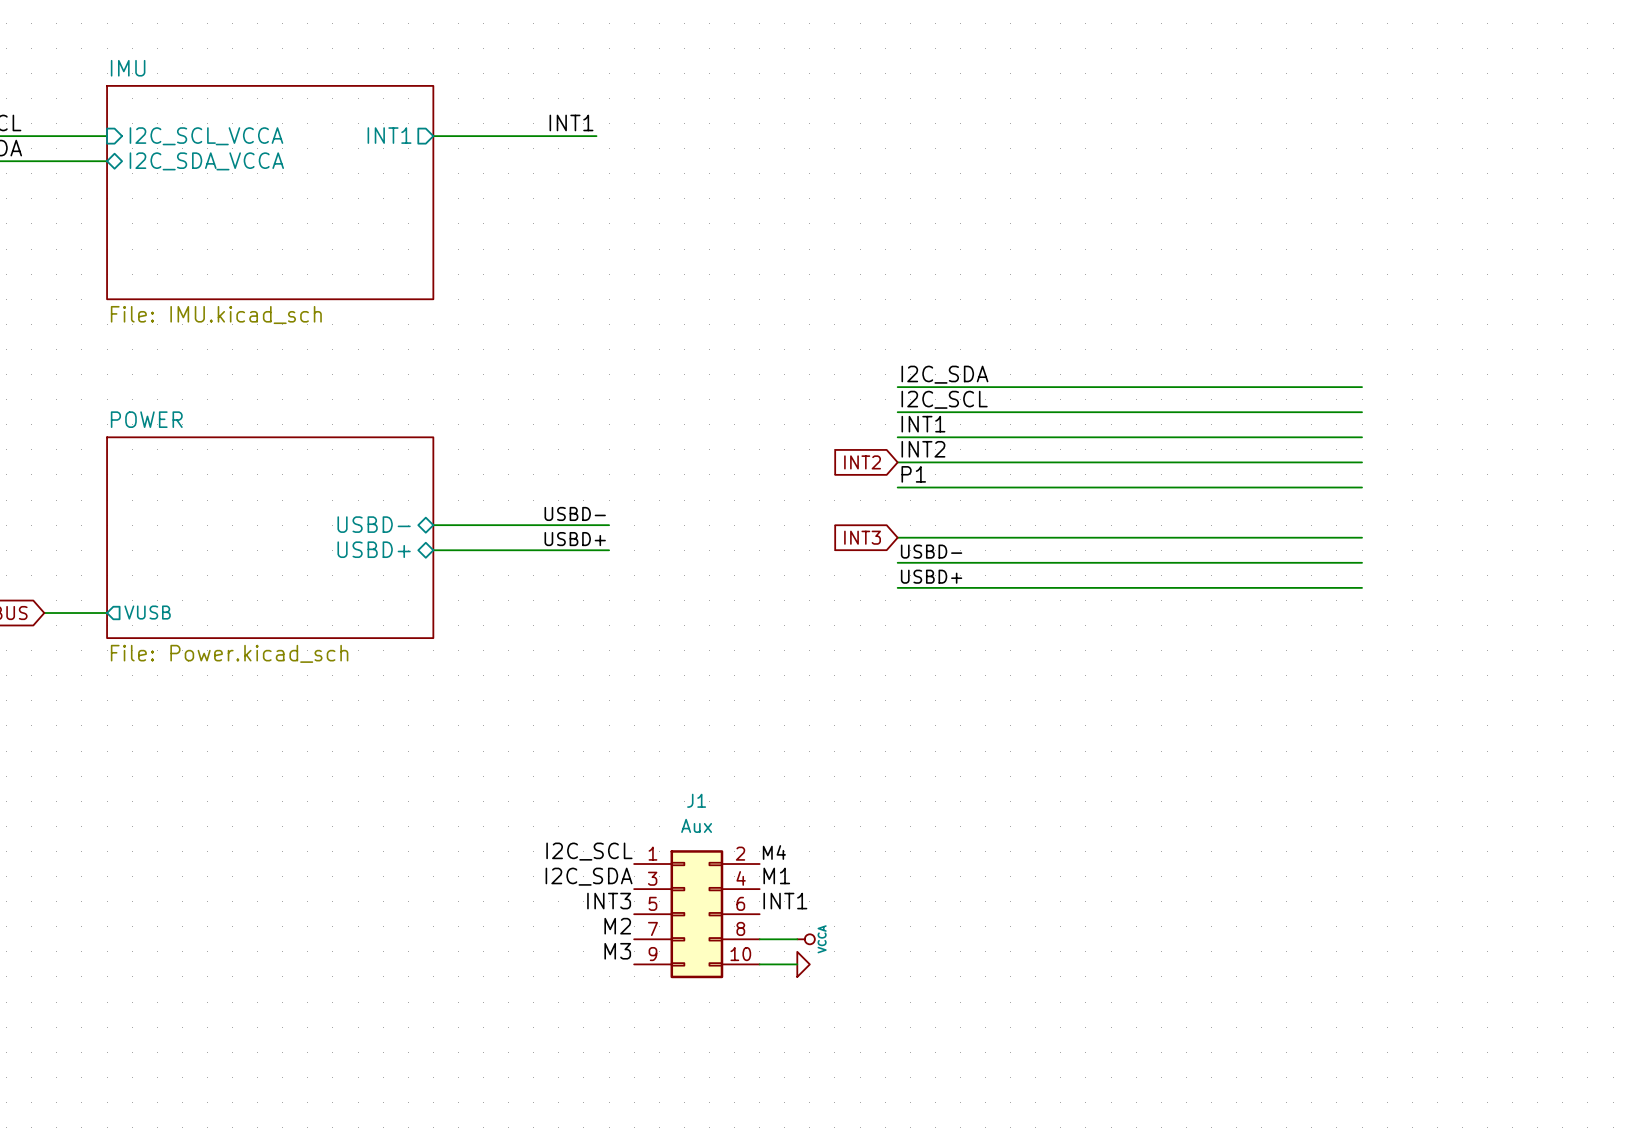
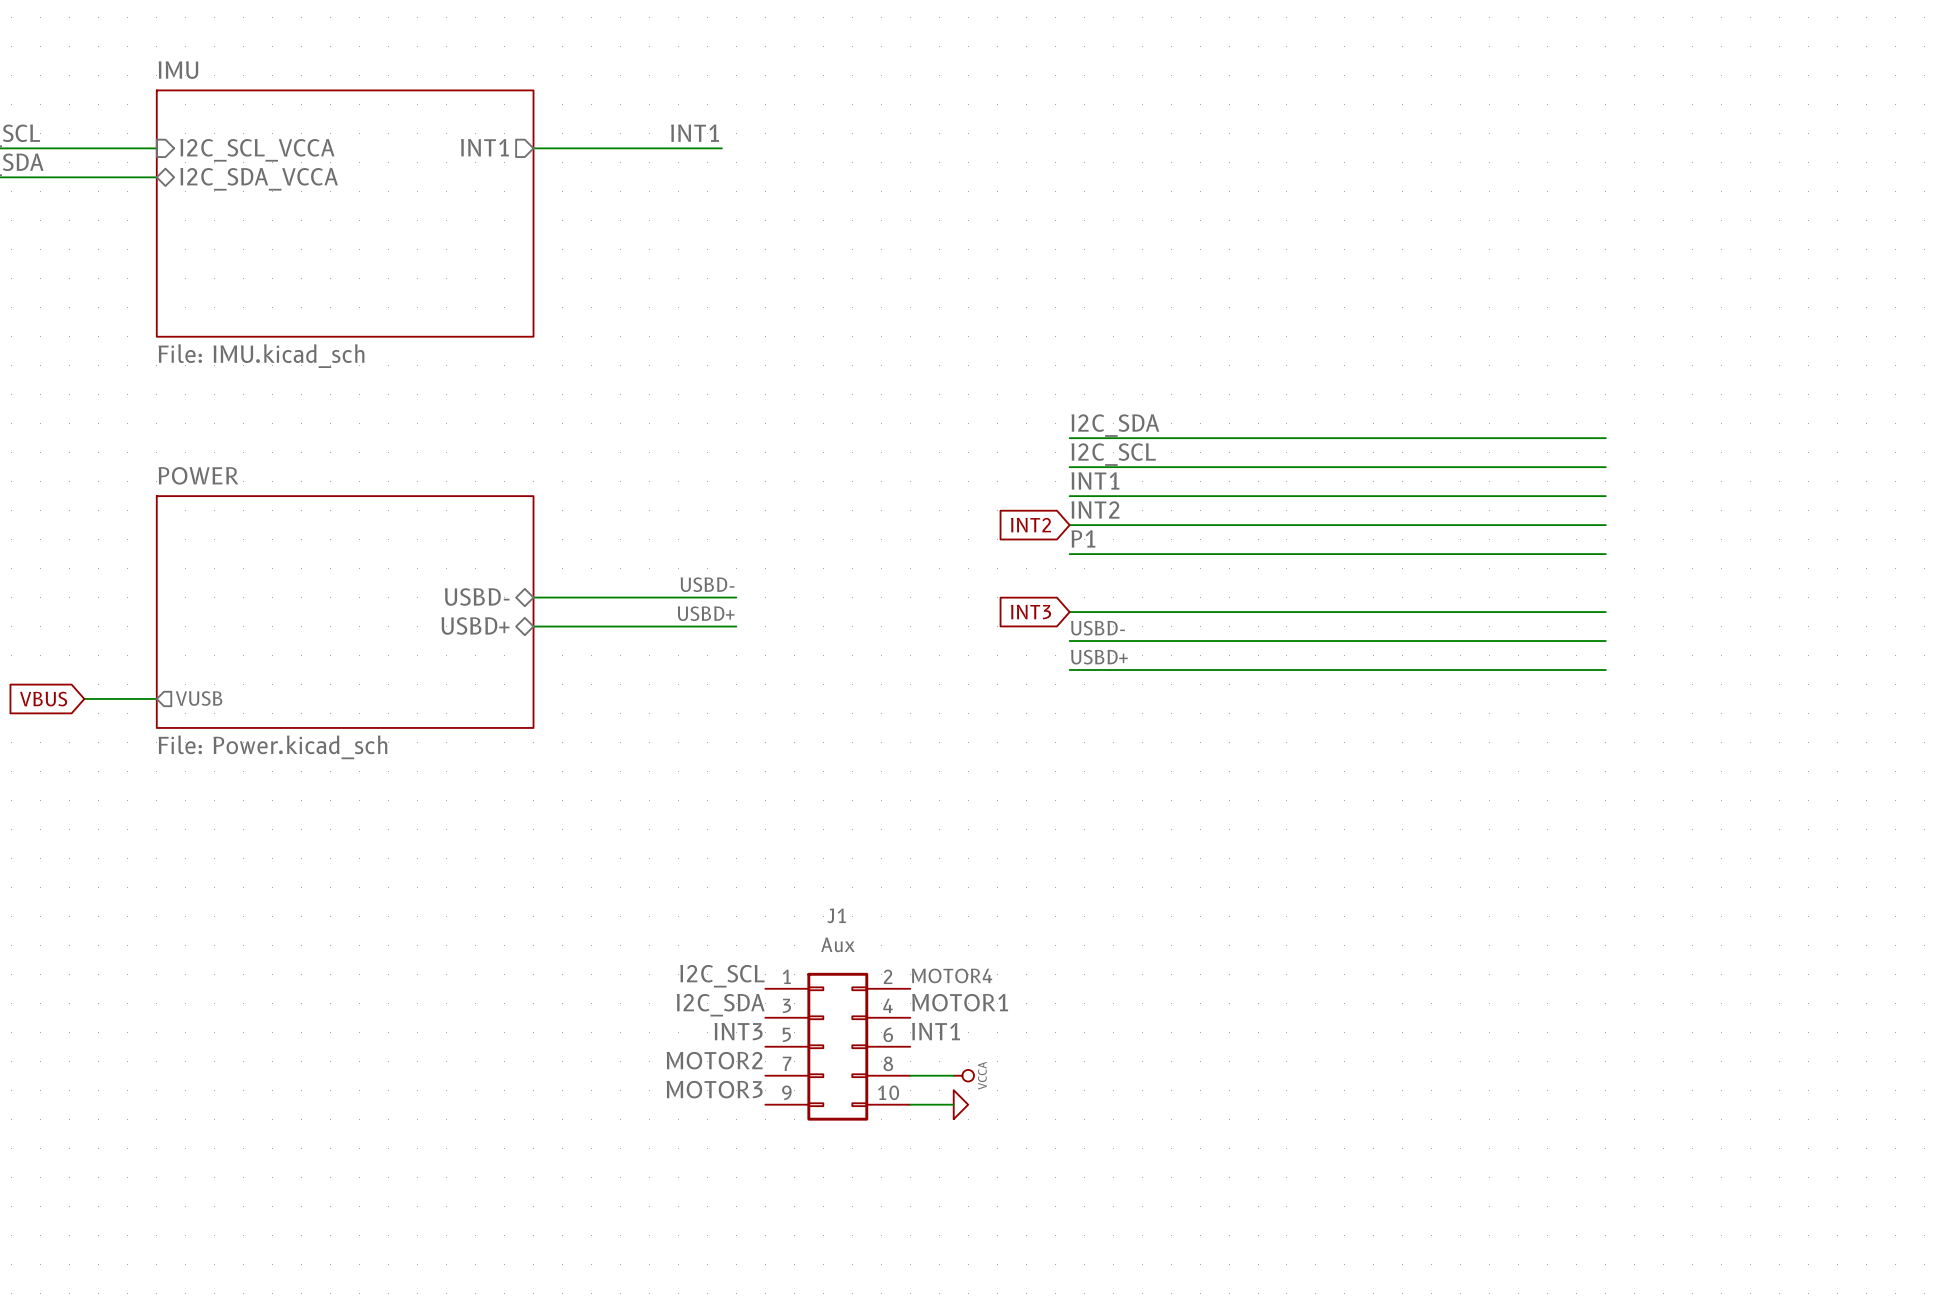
label: M4 (774, 852) -> MOTOR4 (952, 975)
label: M1 (776, 875) -> MOTOR1 (960, 1002)
label: M2 (617, 926) -> MOTOR2 (714, 1060)
label: M3 (617, 951) -> MOTOR3 (714, 1089)

